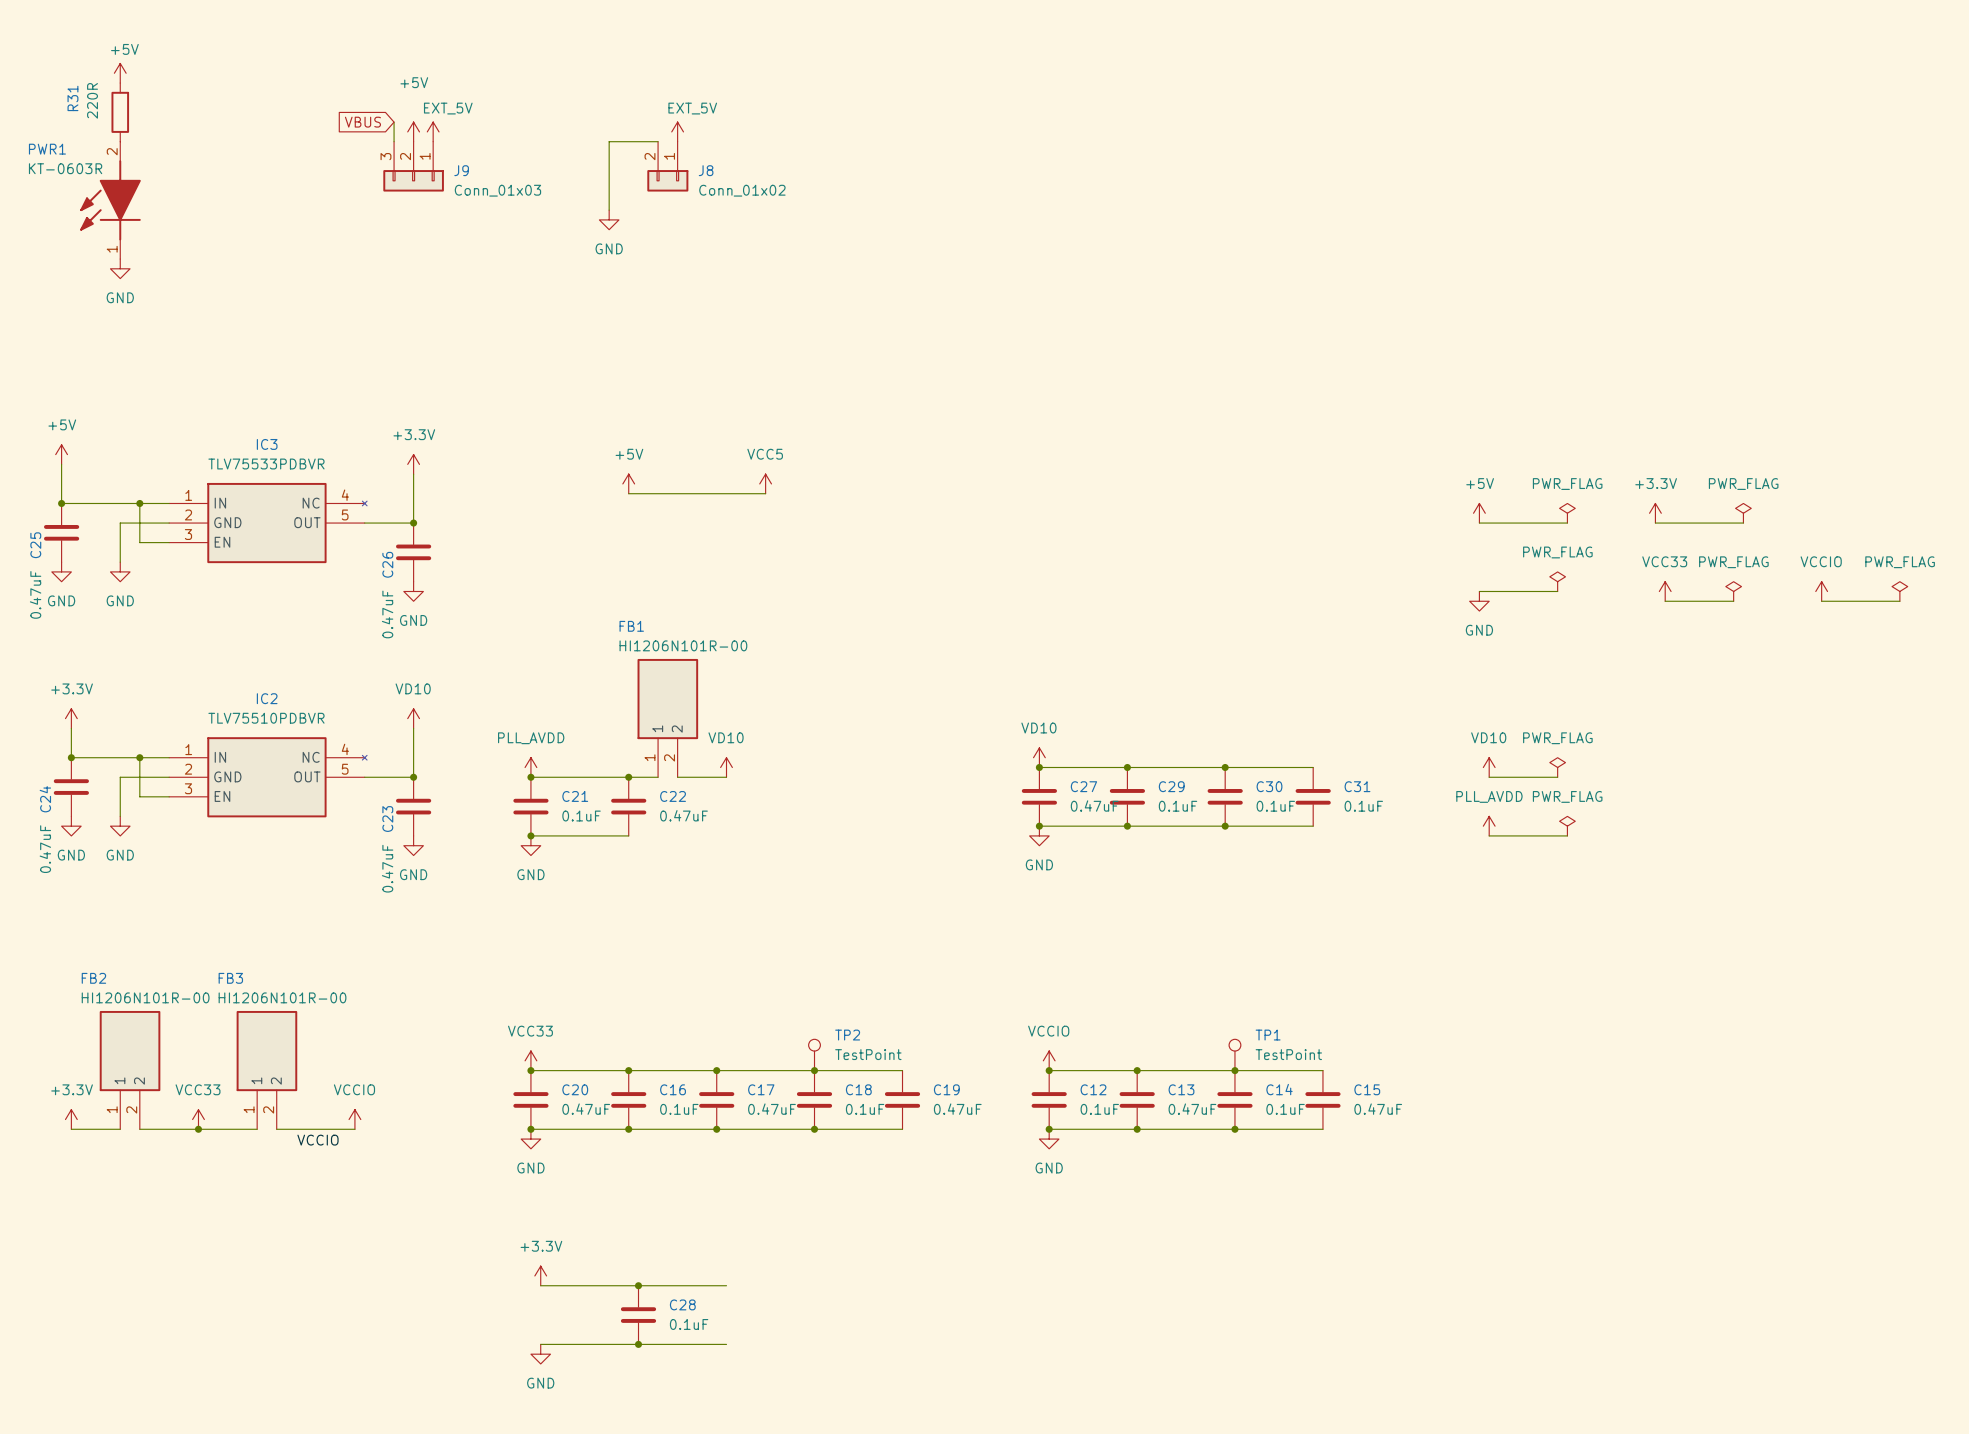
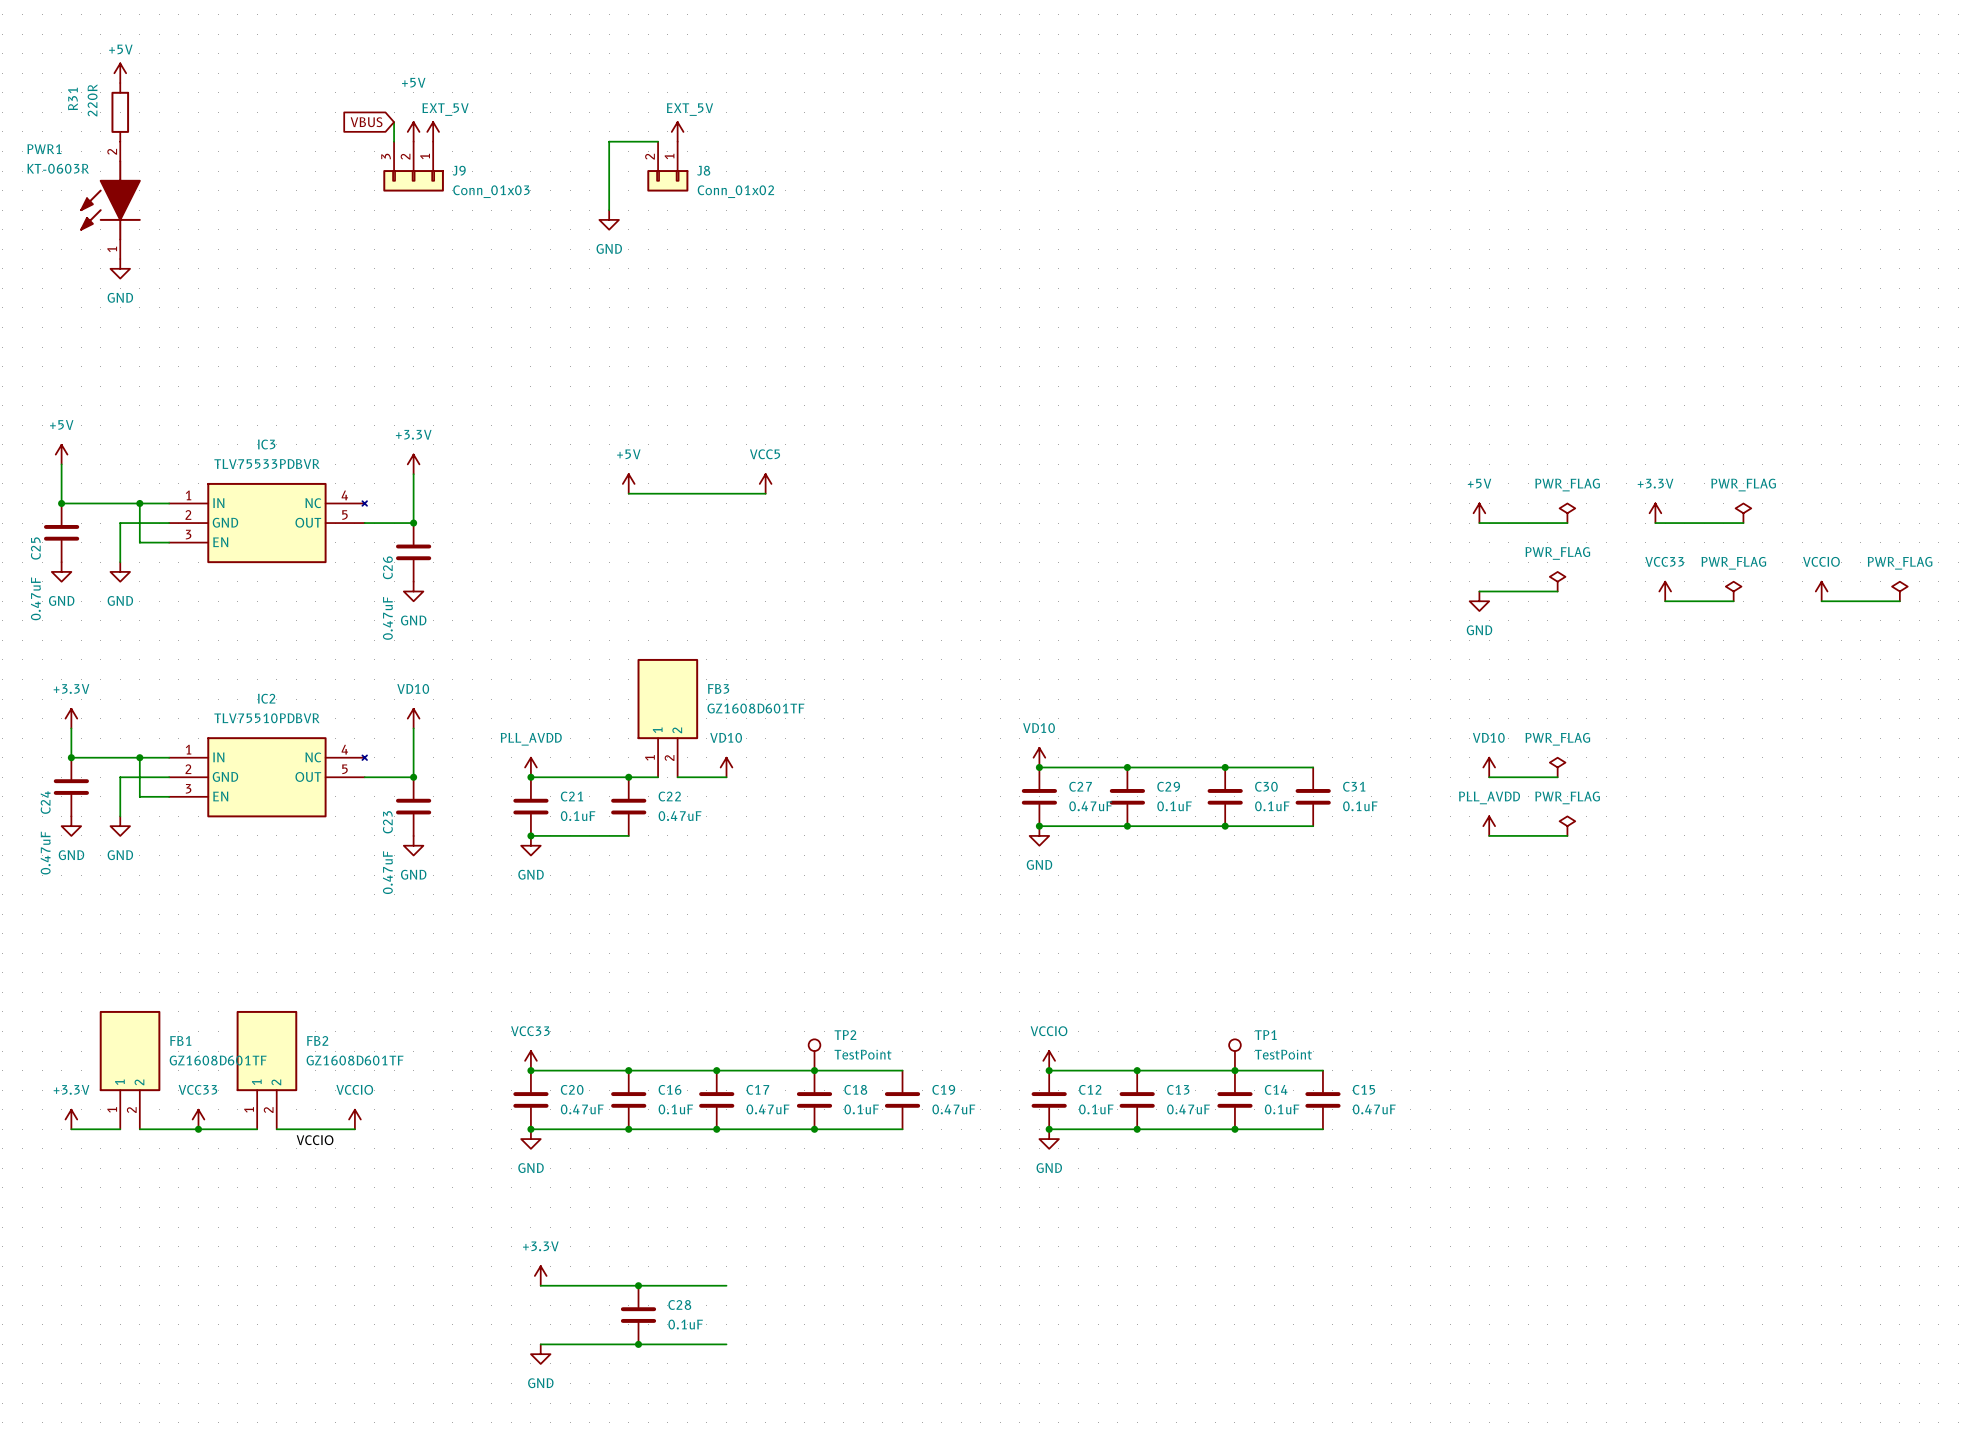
FB1 name: FB1 (631, 626) -> FB3 (718, 688)
FB1 value: HI1206N101R-00 (683, 645) -> GZ1608D601TF (755, 708)
FB2 name: FB2 (93, 978) -> FB1 (180, 1040)
FB3 name: FB3 (230, 978) -> FB2 (317, 1040)
FB2 value: HI1206N101R-00 (145, 997) -> GZ1608D601TF (218, 1060)
FB3 value: HI1206N101R-00 (282, 997) -> GZ1608D601TF (355, 1060)

